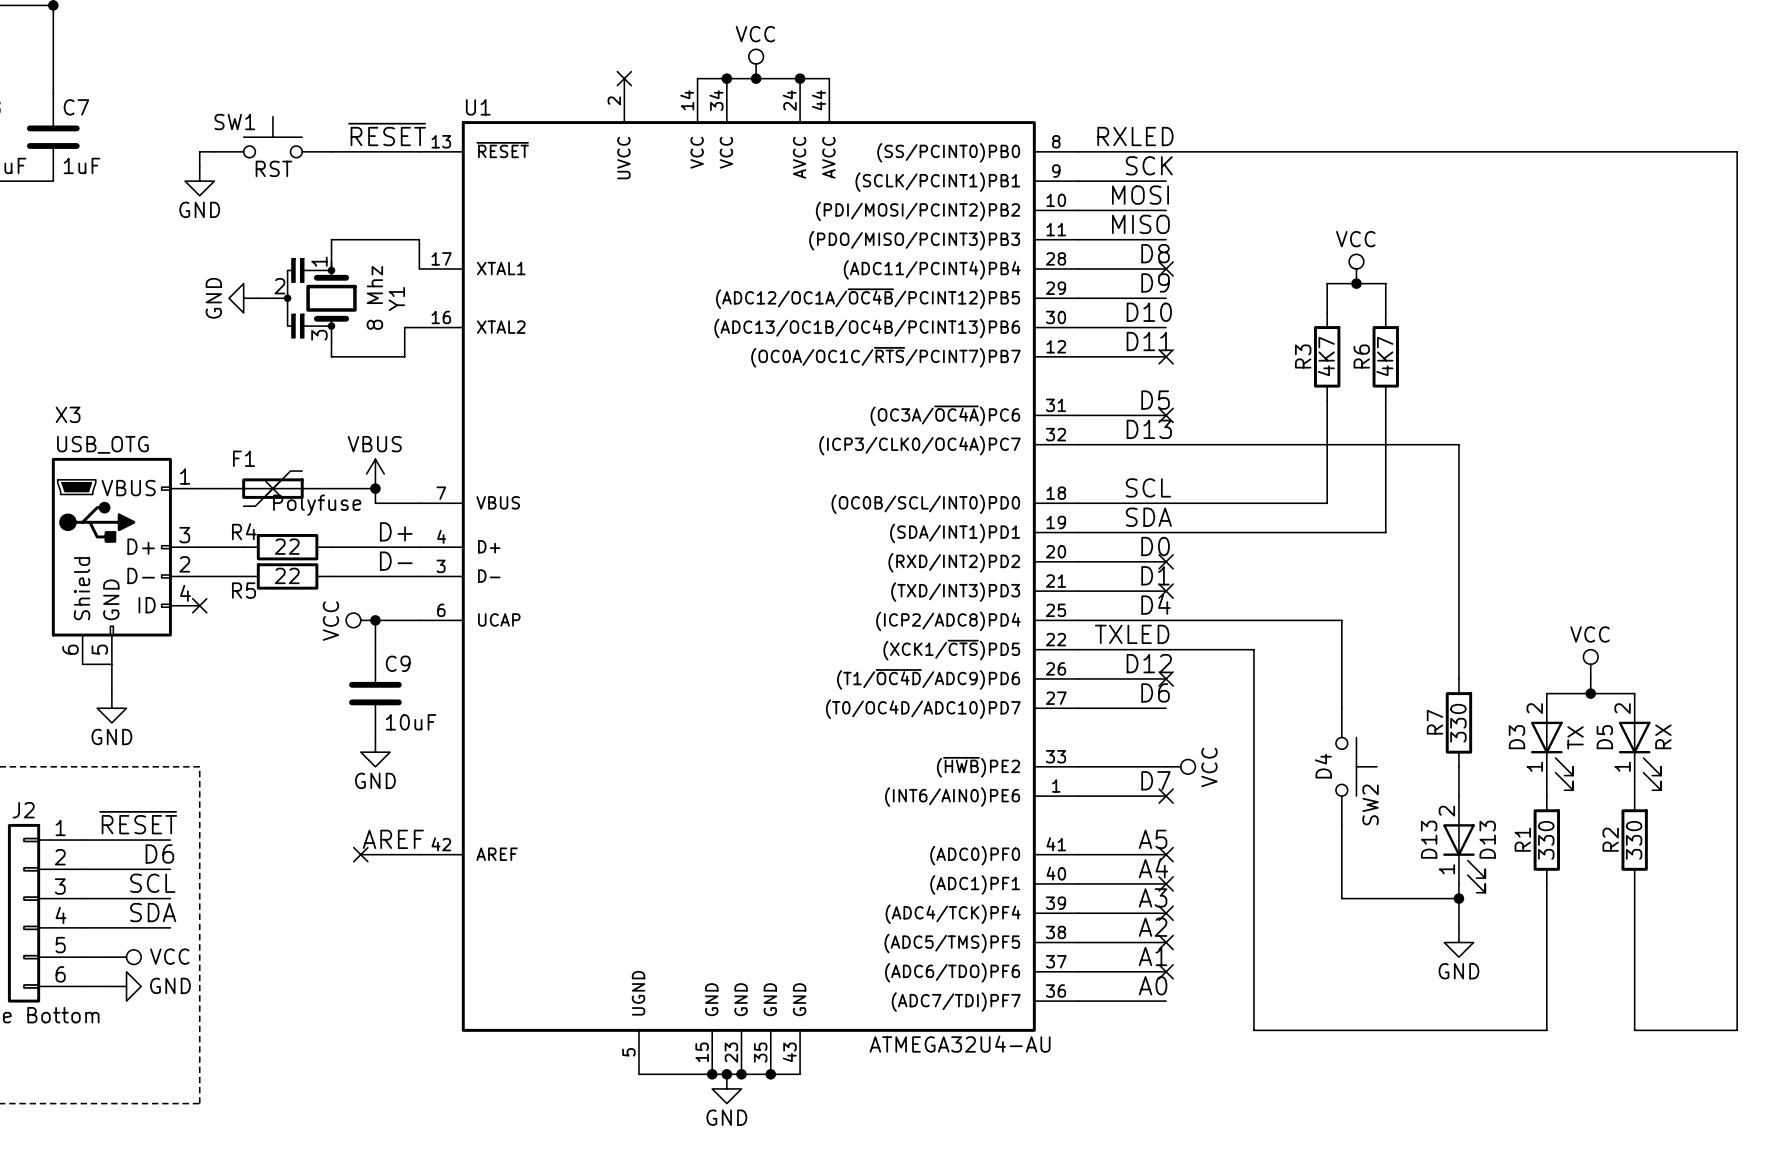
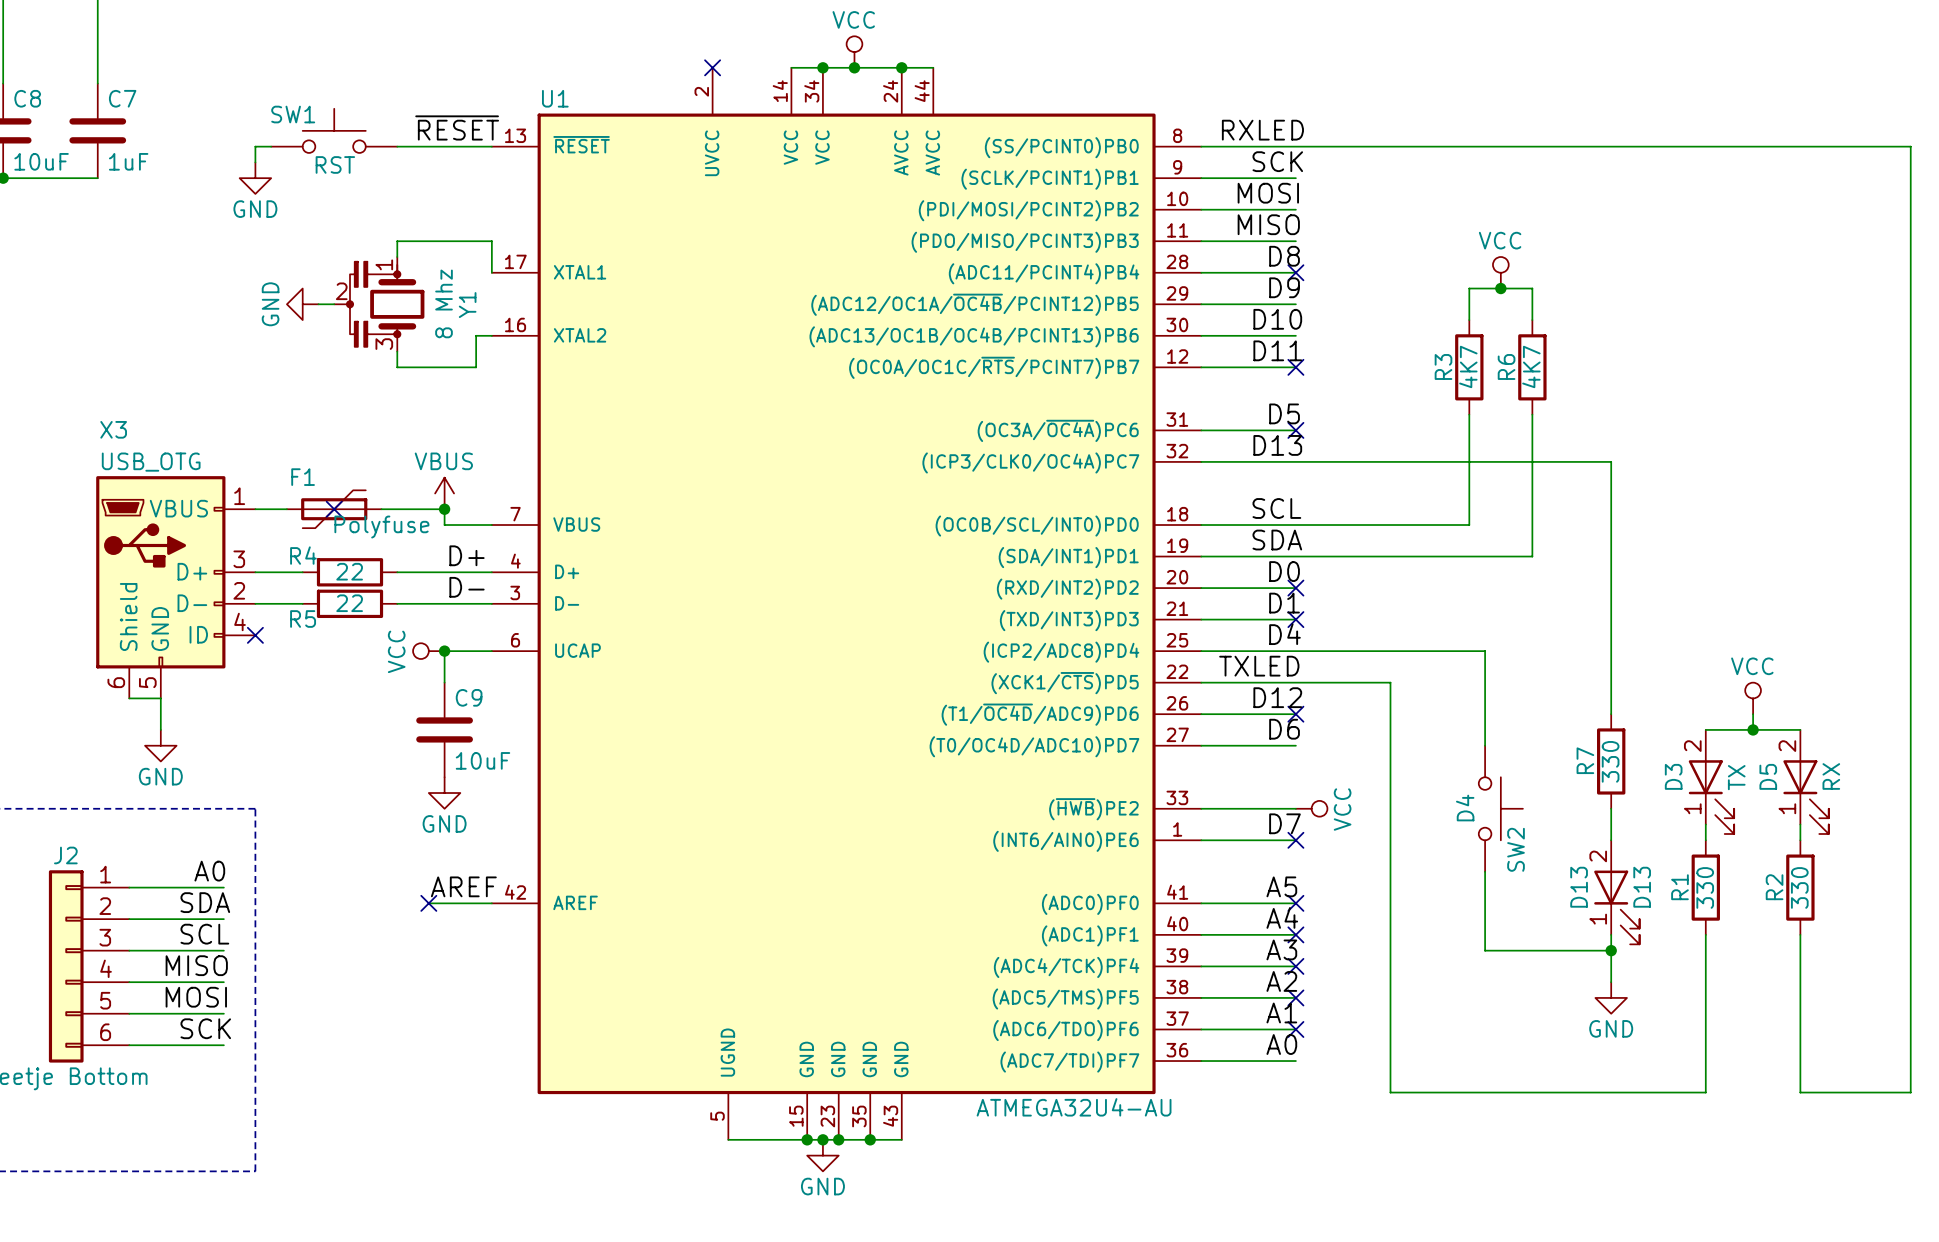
label: ~{RESET} (138, 822) -> none
label: none -> A0 (209, 871)
label: D6 (159, 853) -> none
label: none -> MISO (196, 965)
label position: SDA (153, 912) -> SDA (205, 902)
label: none -> MOSI (196, 997)
wire: none -> (160, 1013) (223, 1013)
power symbol: VCC (126, 957) -> none
label: none -> SCK (205, 1028)
wire: none -> (160, 1045) (223, 1045)
power symbol: GND (126, 986) -> none

